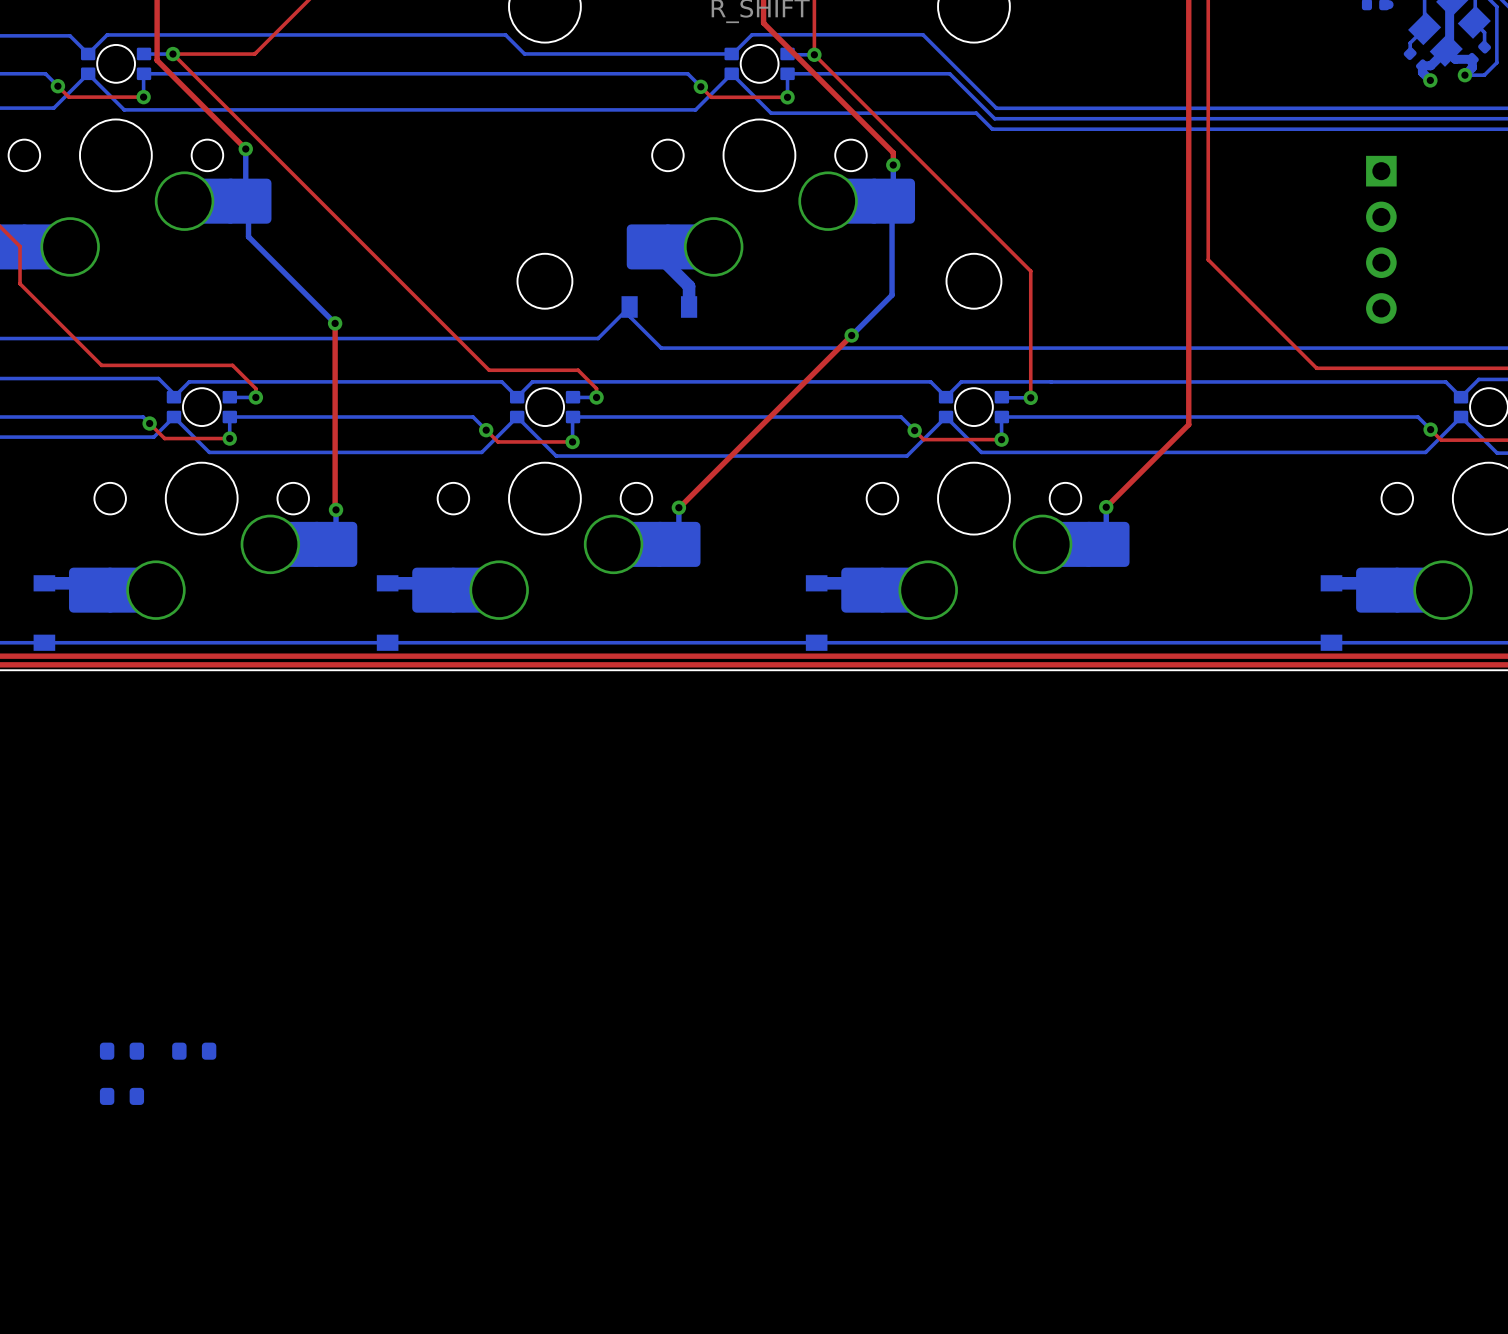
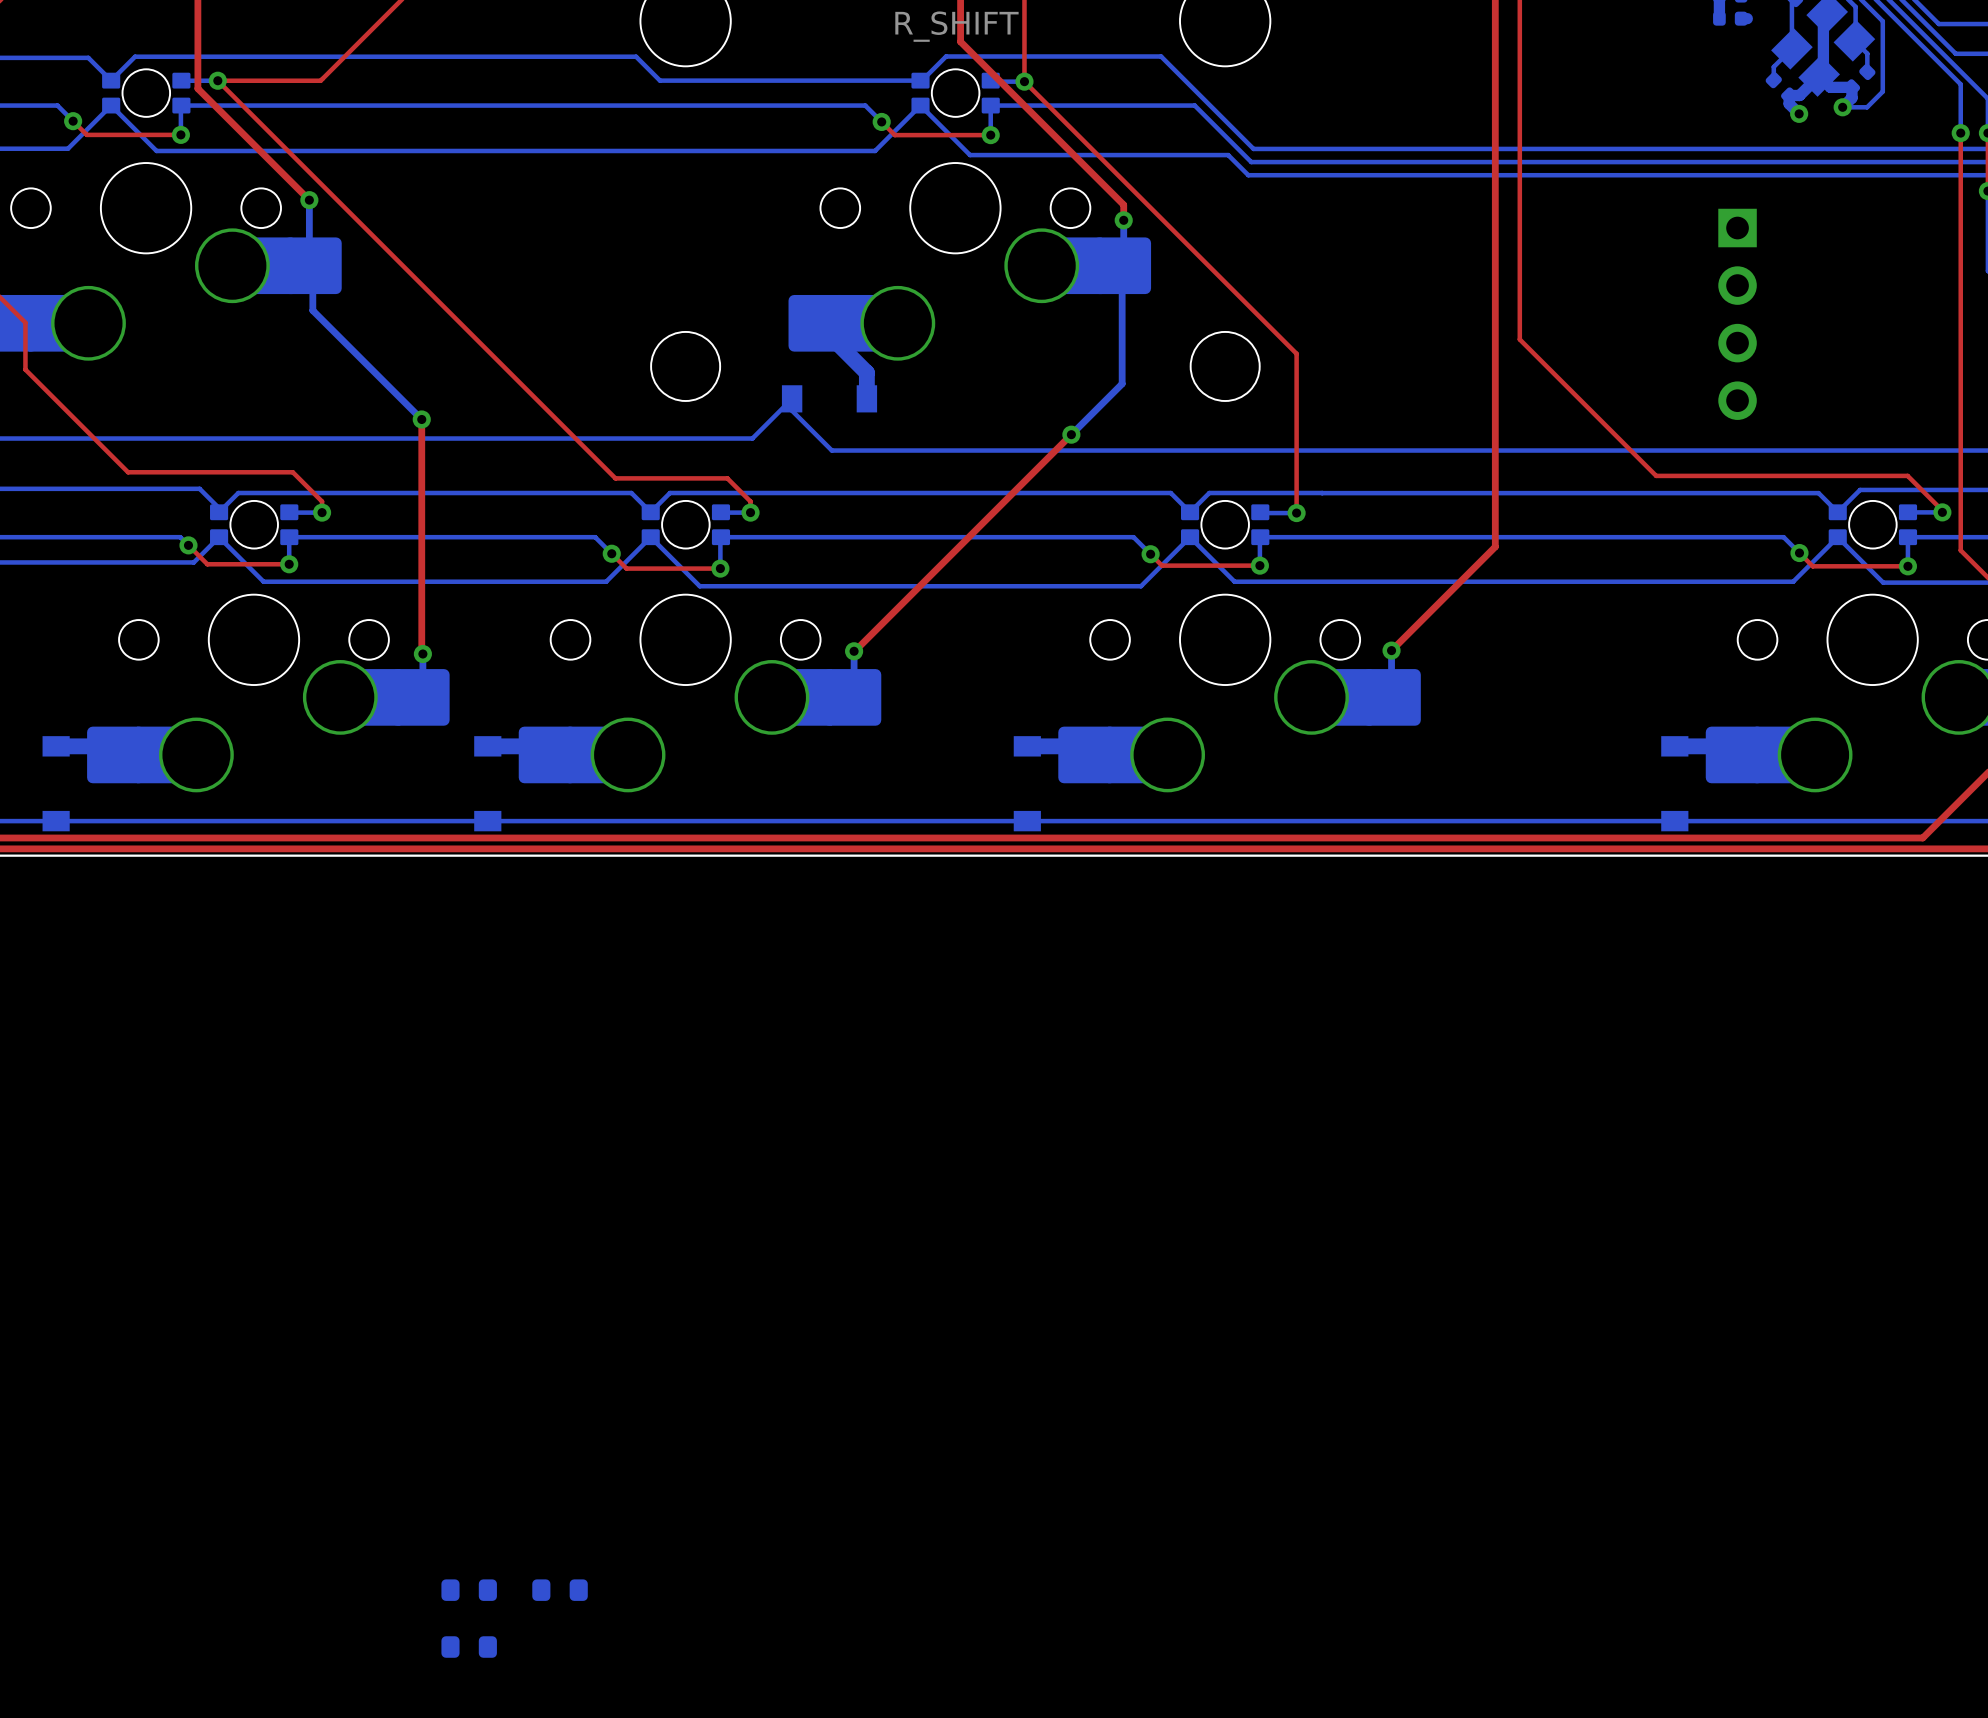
part: (121, 1051) -> none
part: (194, 1051) -> none
part: (121, 1096) -> none
part: none -> (469, 1590)
part: none -> (560, 1590)
part: none -> (469, 1647)

